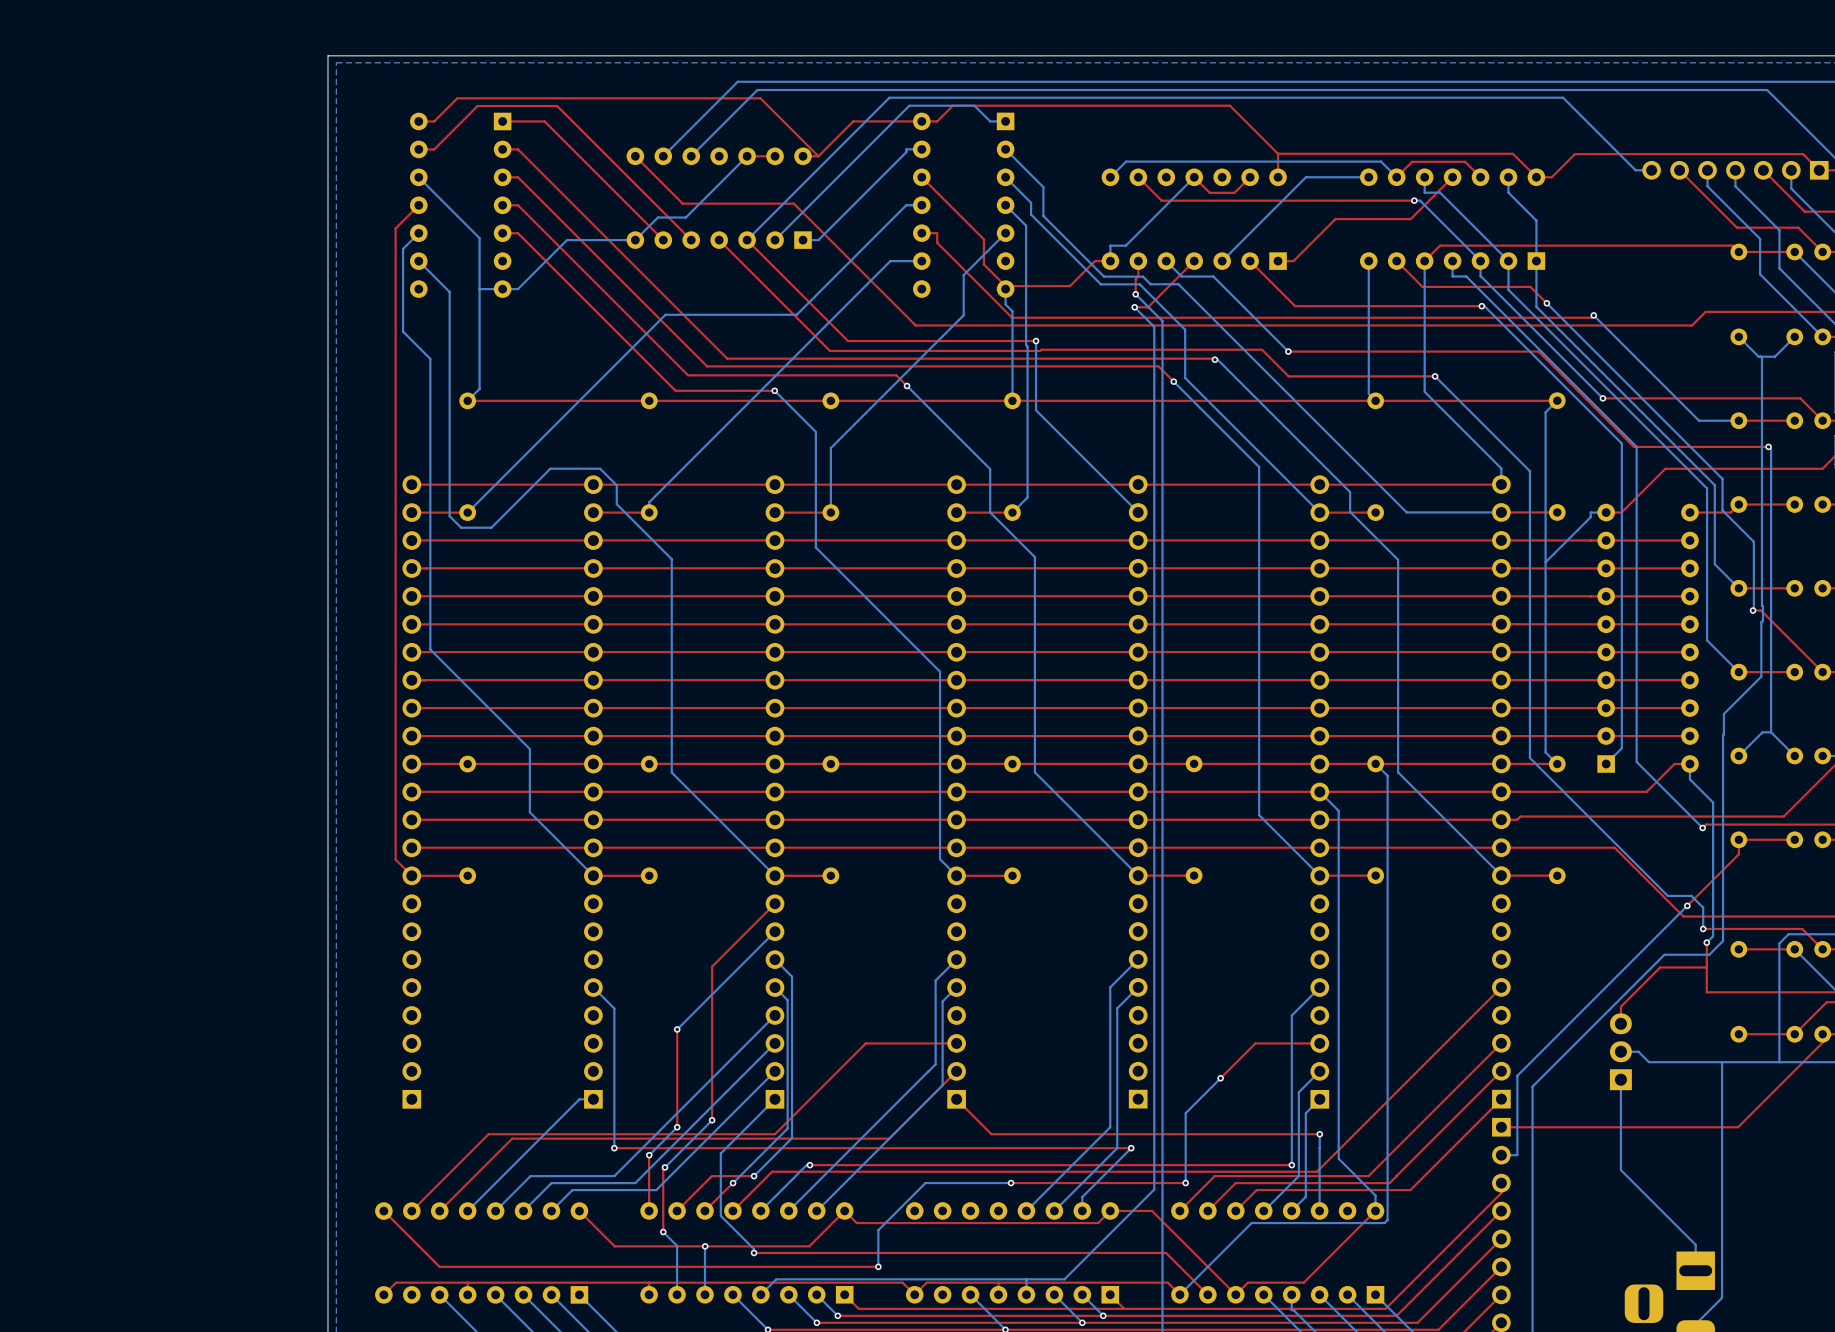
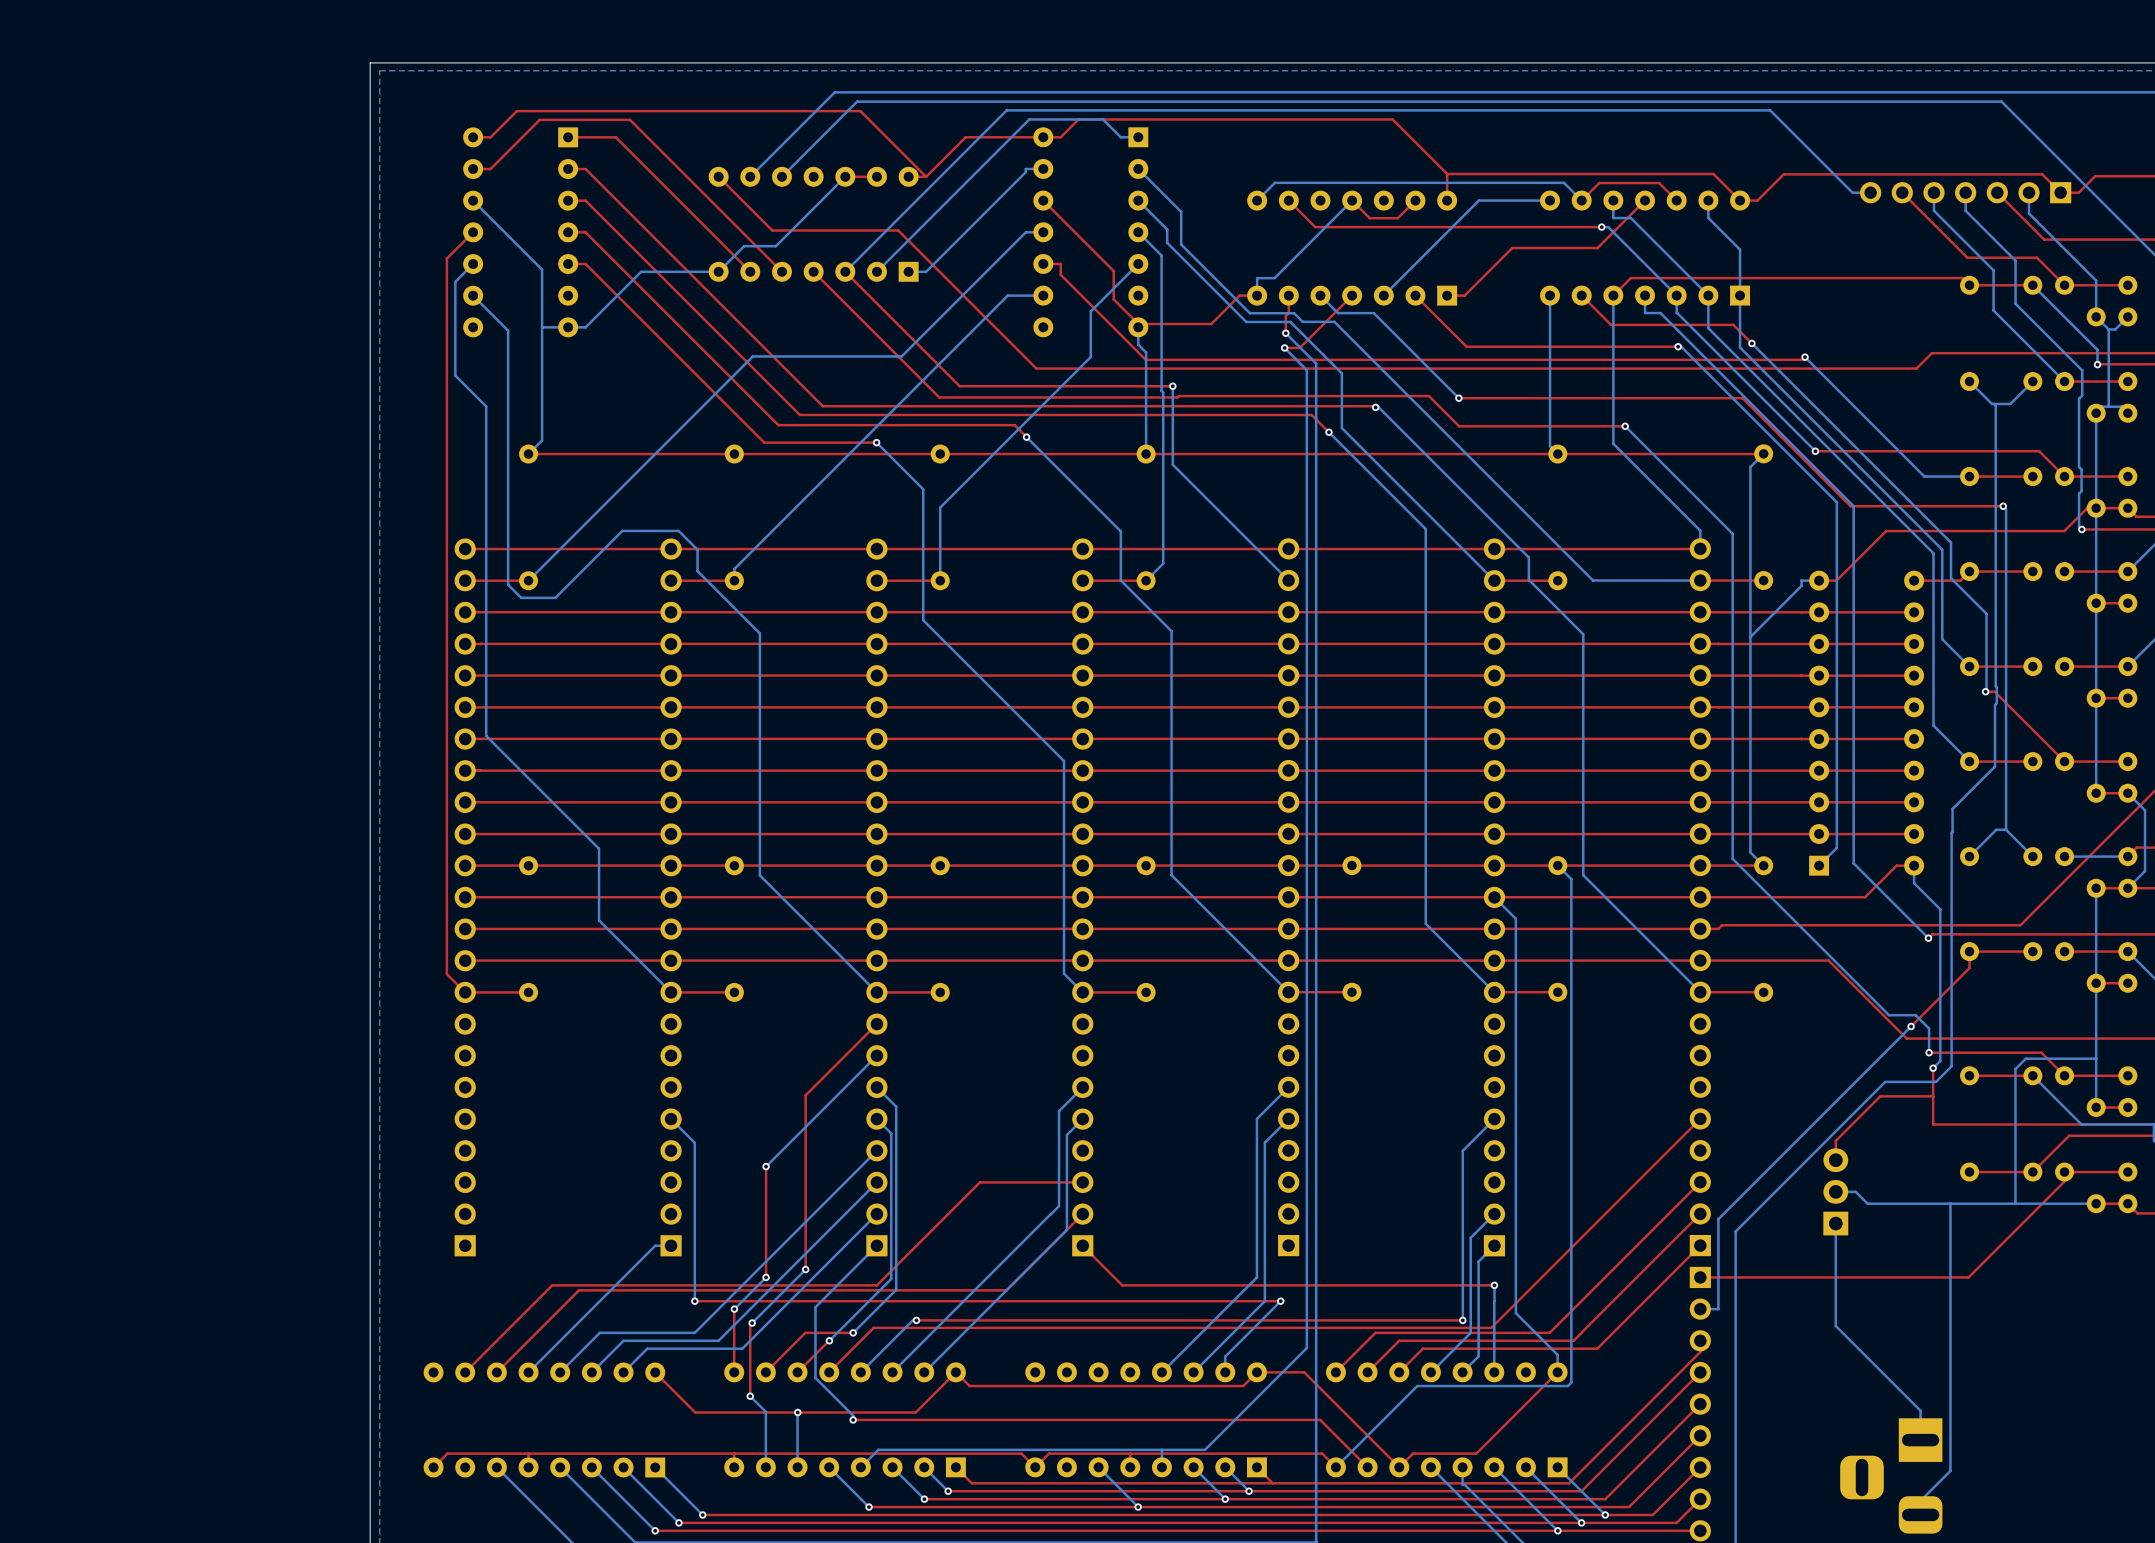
top track: (1319, 1043) (1255, 1043) (1220, 1078) -> none
bottom track: (1220, 1078) (1185, 1113) (1185, 1183) -> none
via: (1220, 1078) -> none
bottom track: (1011, 1183) (925, 1183) (878, 1230) (878, 1266) -> none
via: (1011, 1183) -> none
top track: (1185, 1183) (1011, 1183) -> none
via: (1185, 1183) -> none
top track: (383, 1211) (439, 1266) (878, 1266) -> none
via: (878, 1266) -> none

